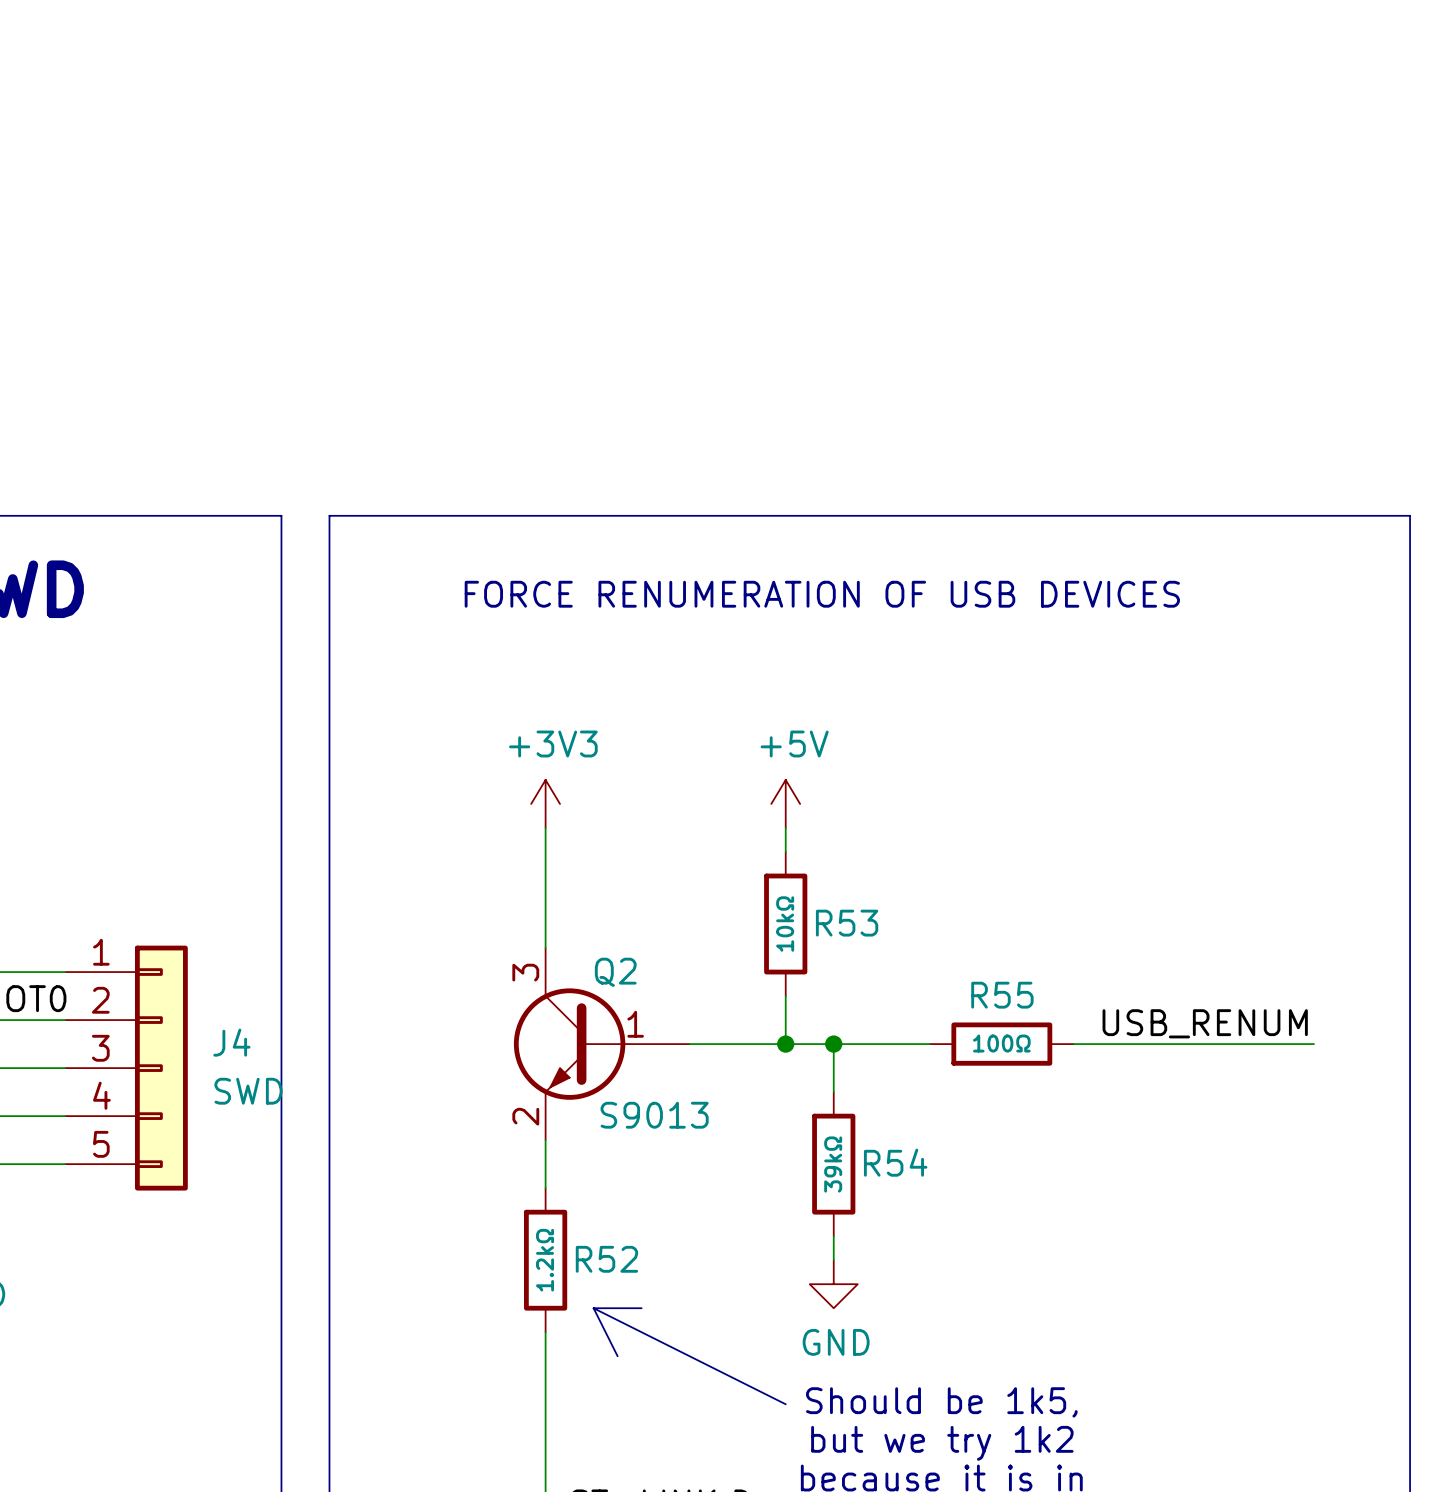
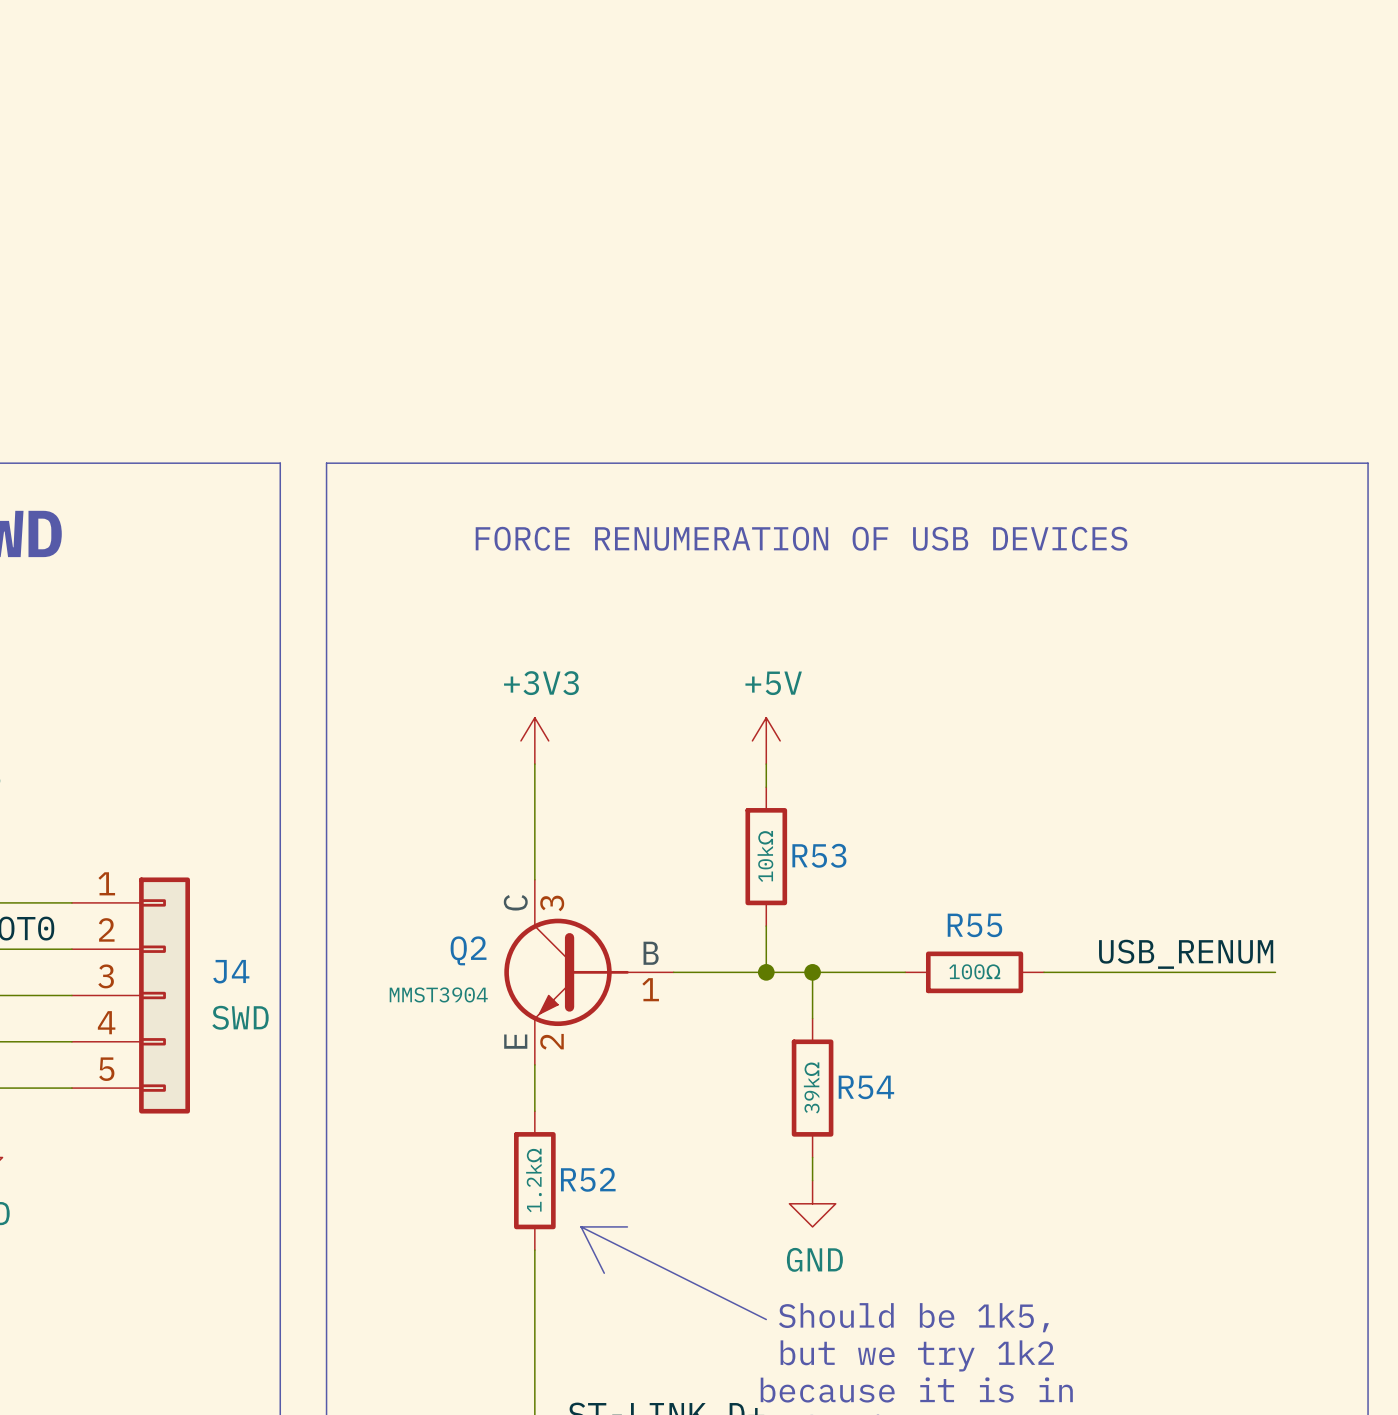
Q2 symbol: [513, 948, 690, 1141] -> [504, 879, 674, 1065]
Q2 name position: Q2 (615, 972) -> Q2 (468, 950)
Q2 value: S9013 (654, 1115) -> MMST3904 (438, 994)

